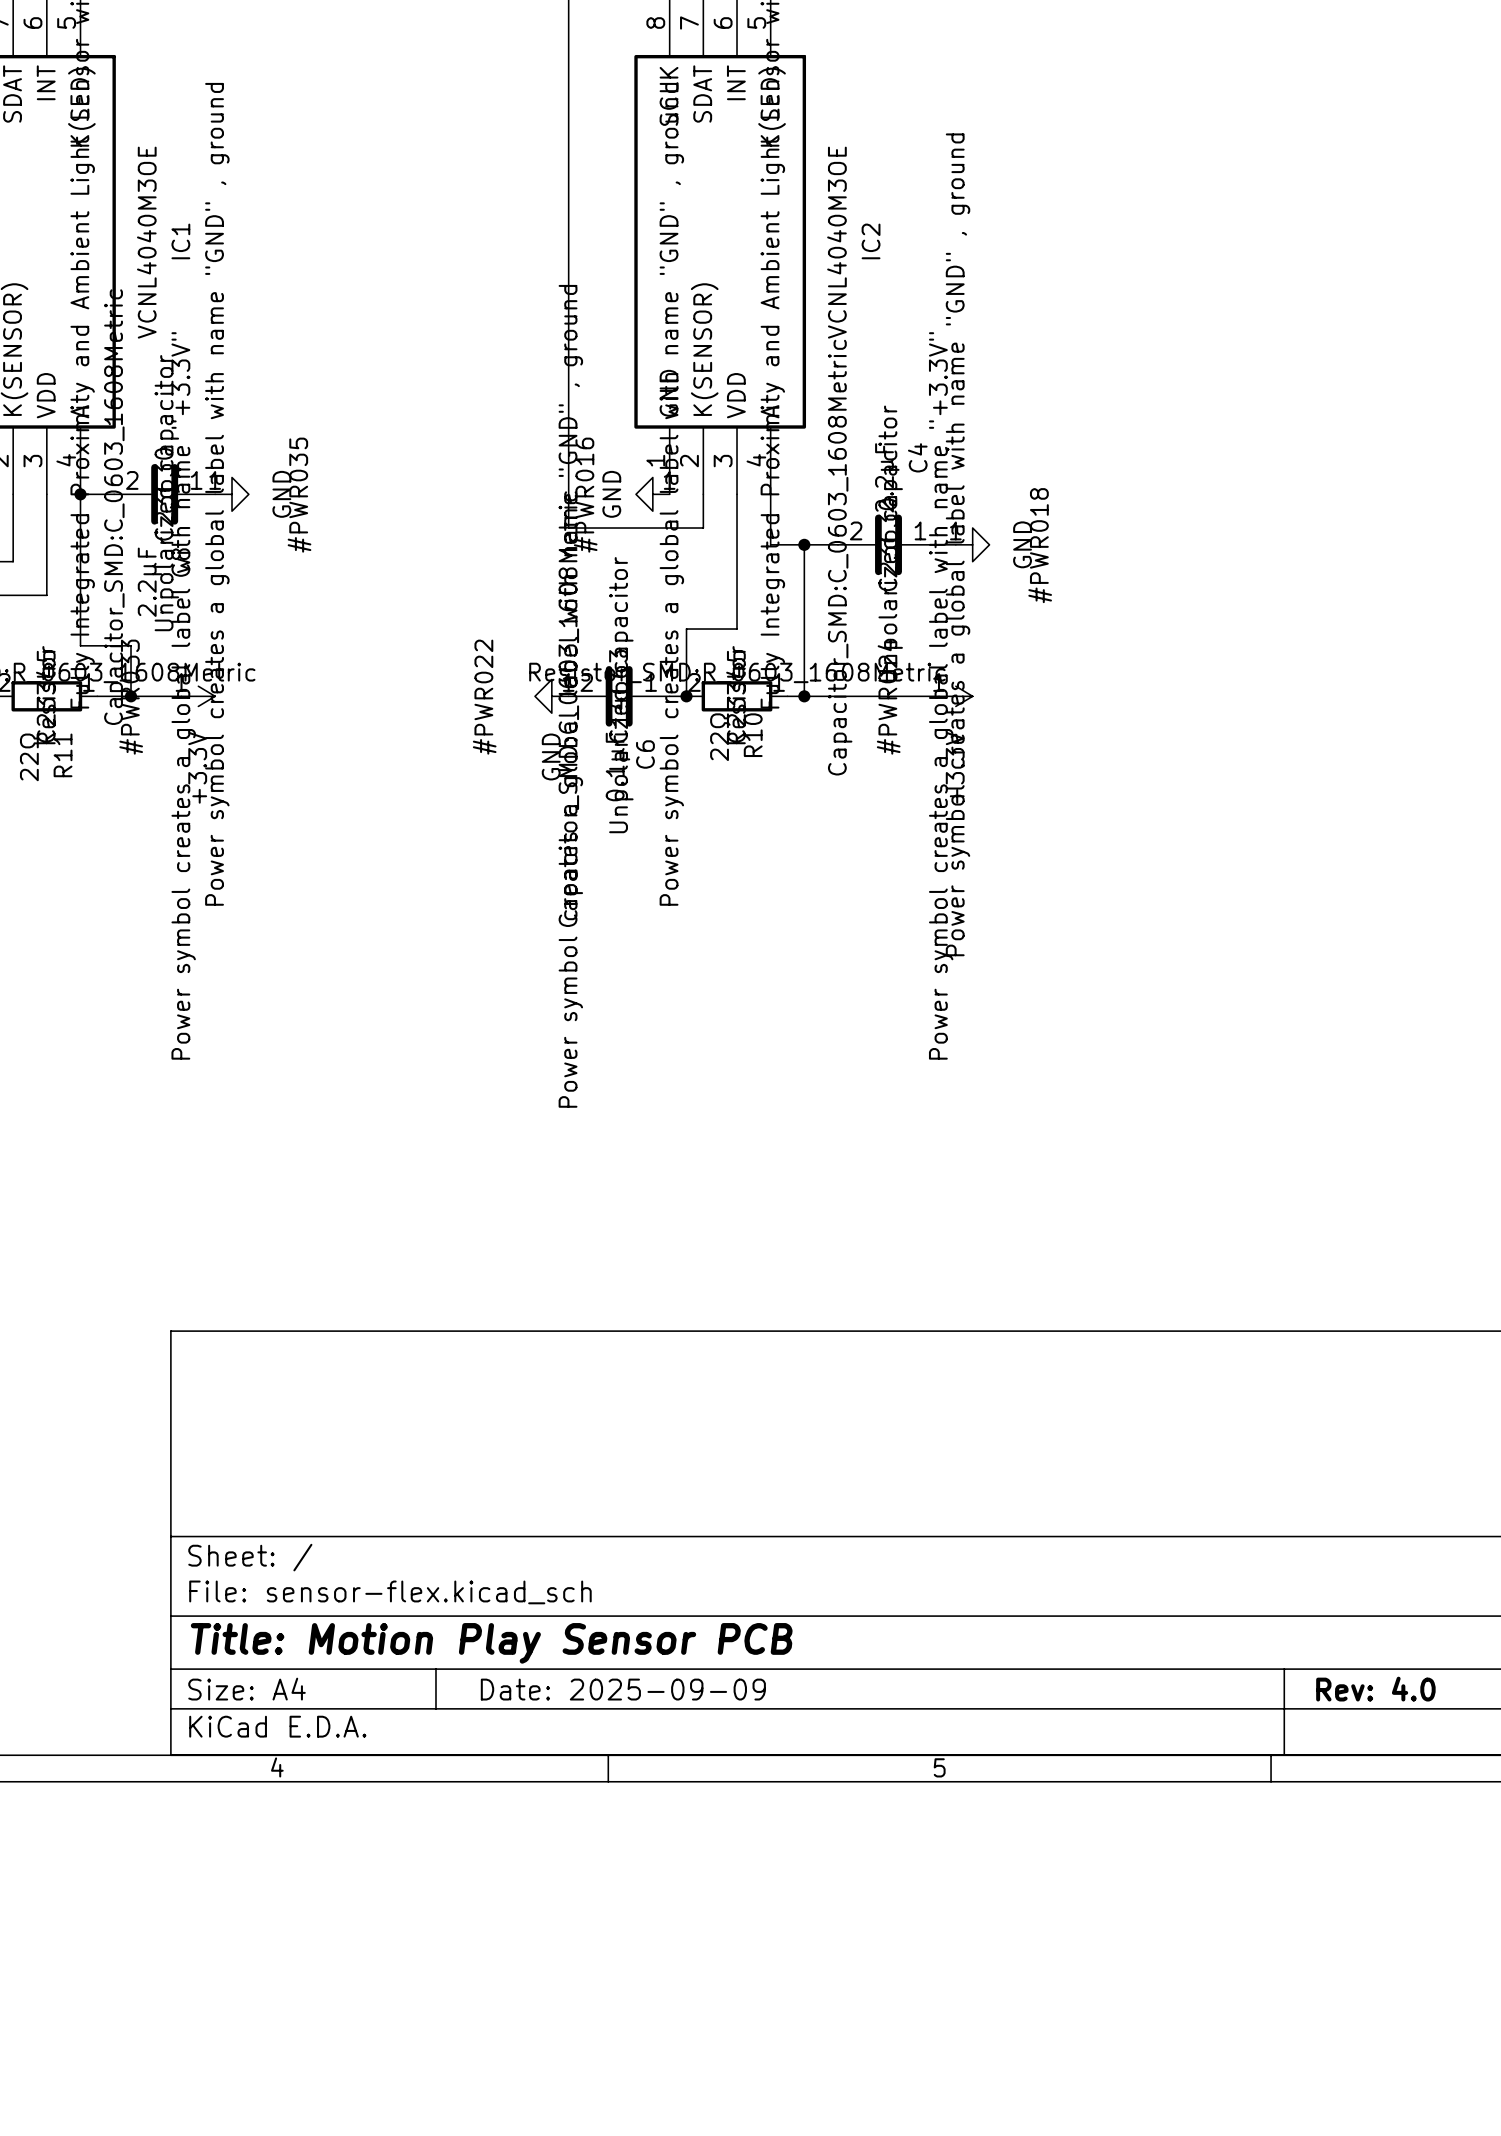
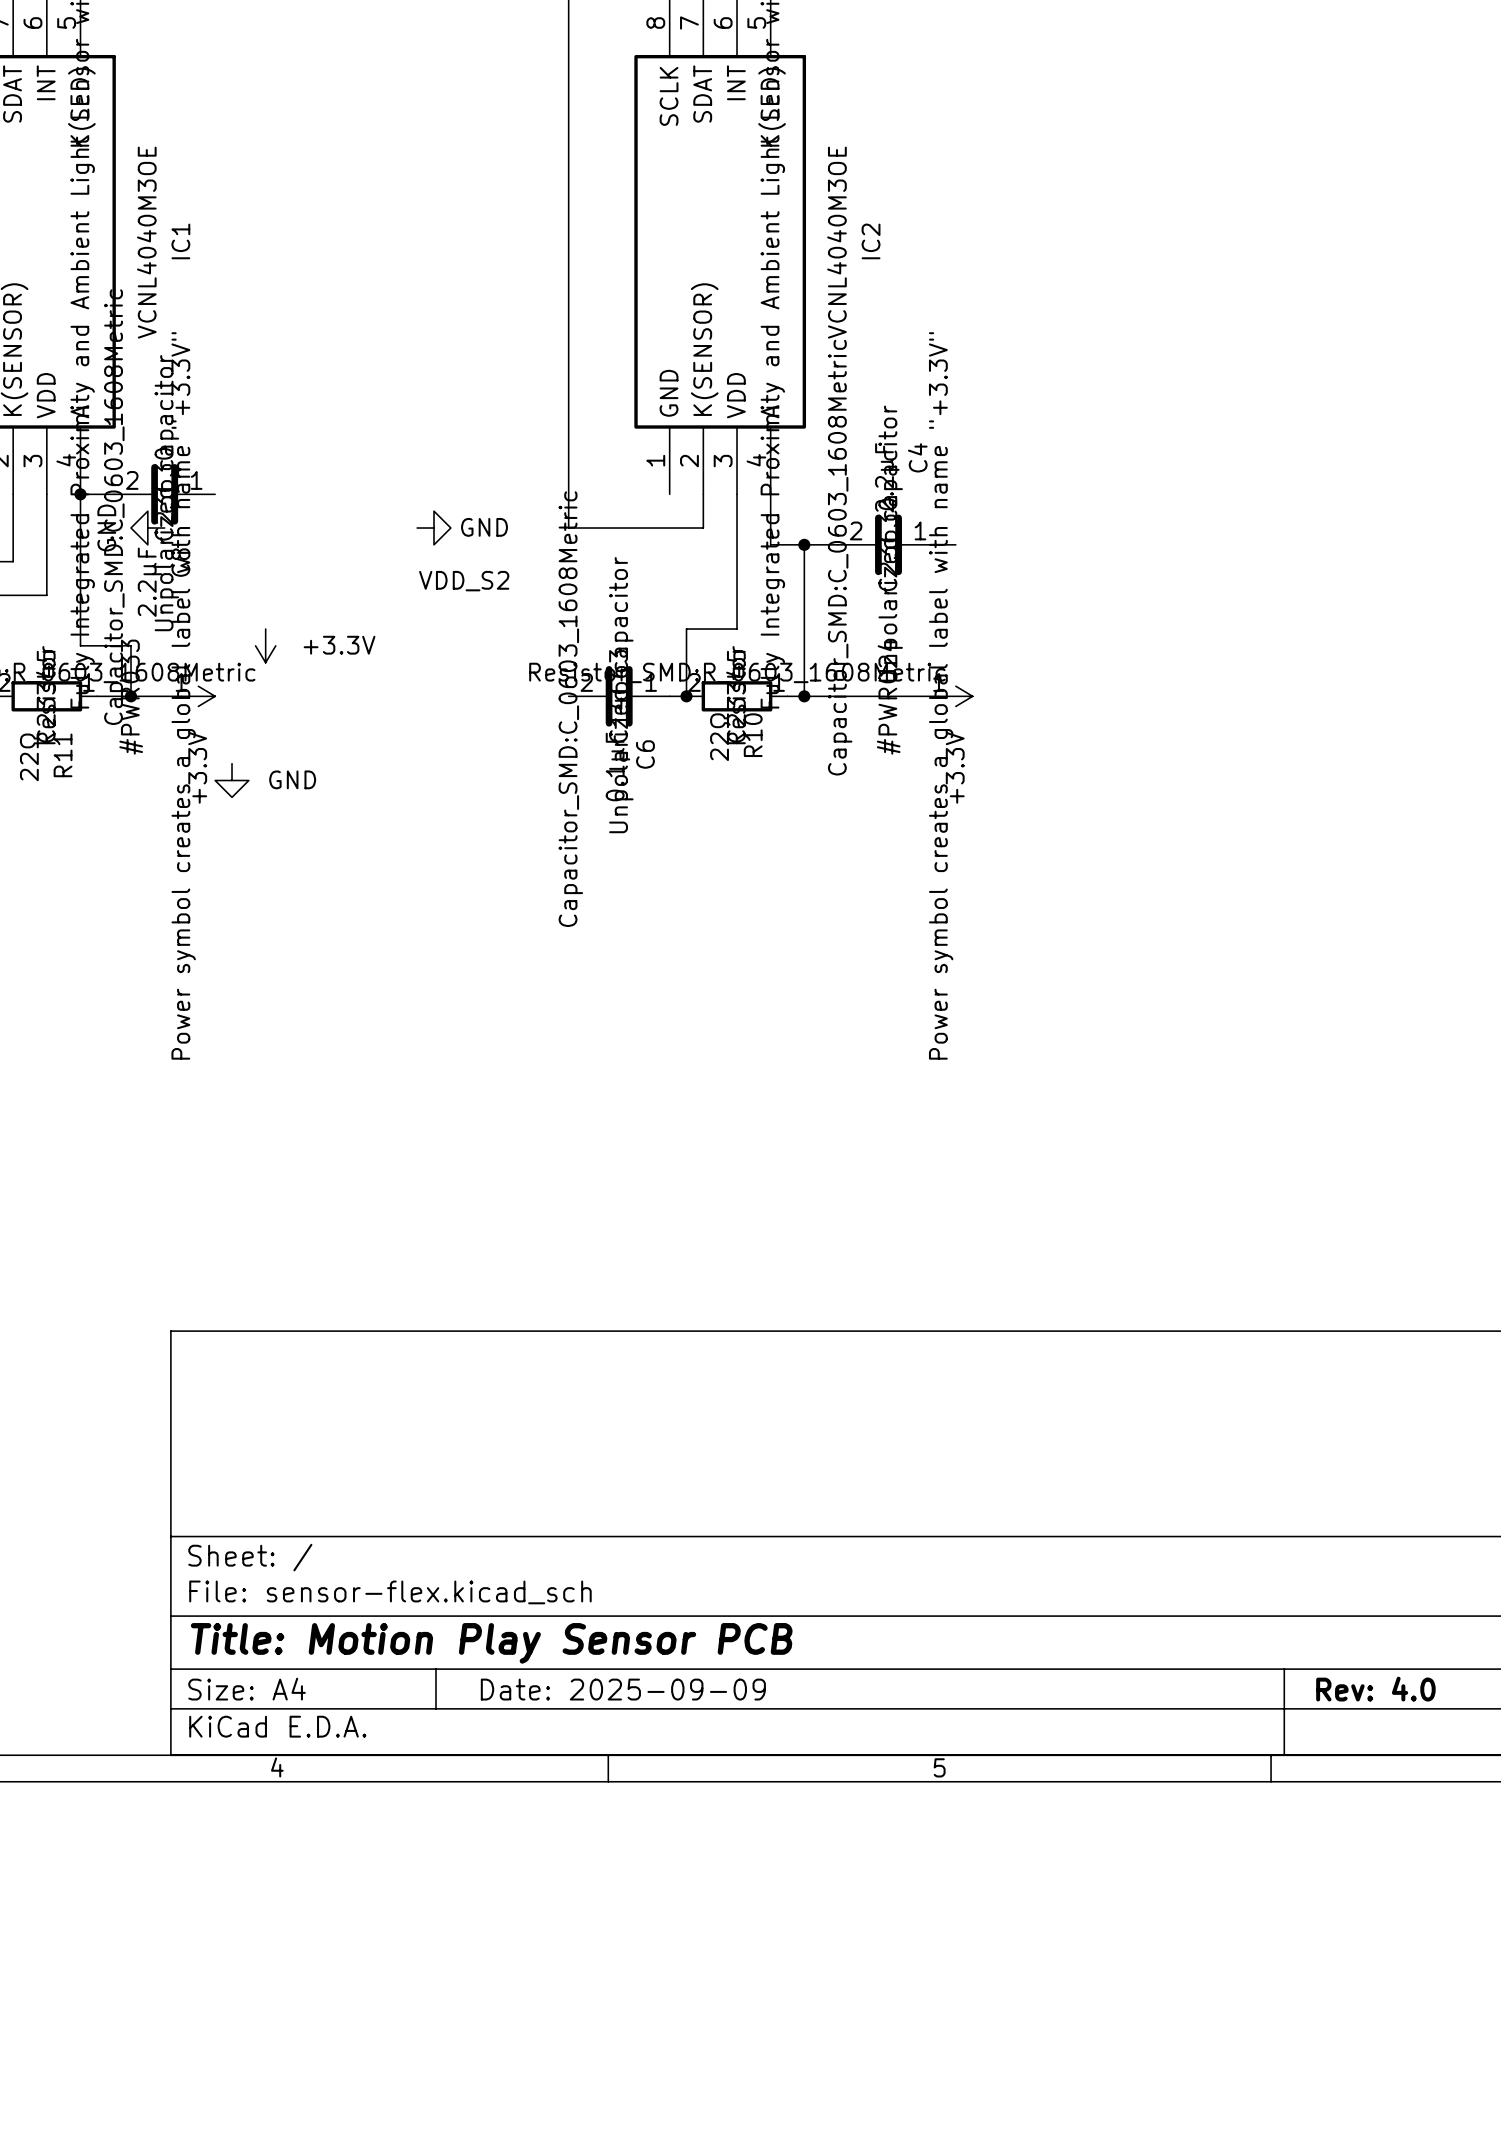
#PWR035: GND (232, 494) -> none
#PWR016: GND (652, 494) -> none
power symbol: none -> GND (147, 528)
power symbol: none -> GND (434, 528)
#PWR018: GND (972, 544) -> none
label: none -> VDD_S2 (464, 581)
power symbol: none -> +3.3V (265, 645)
#PWR022: GND (551, 696) -> none
power symbol: none -> GND (232, 780)

